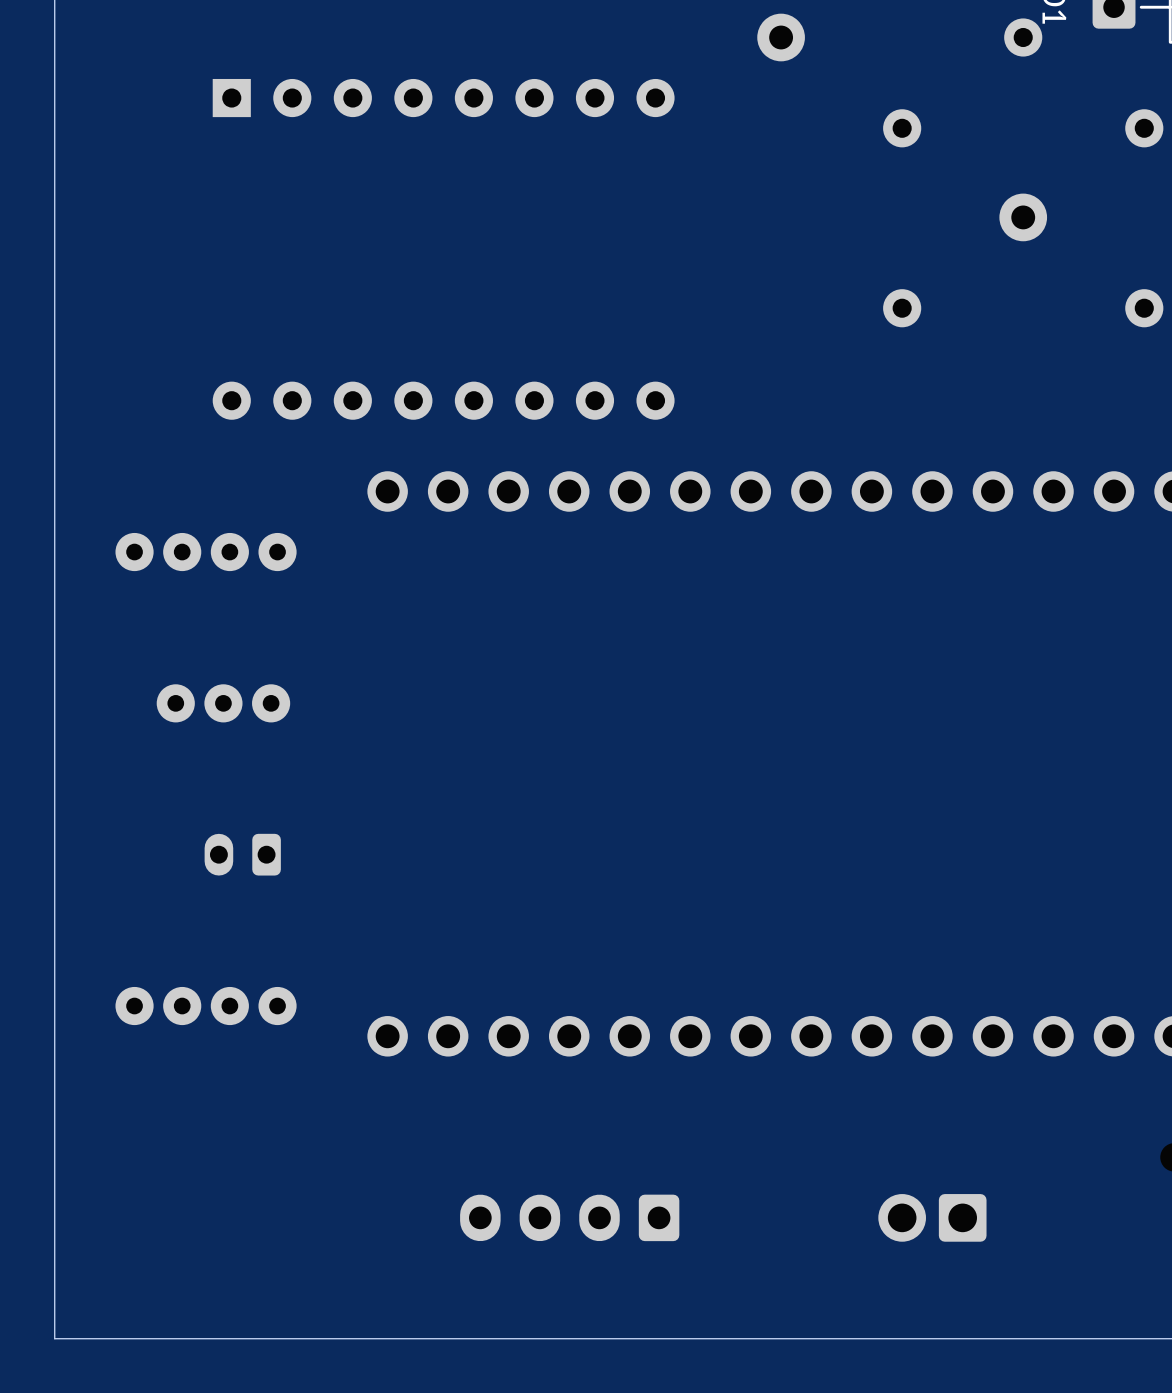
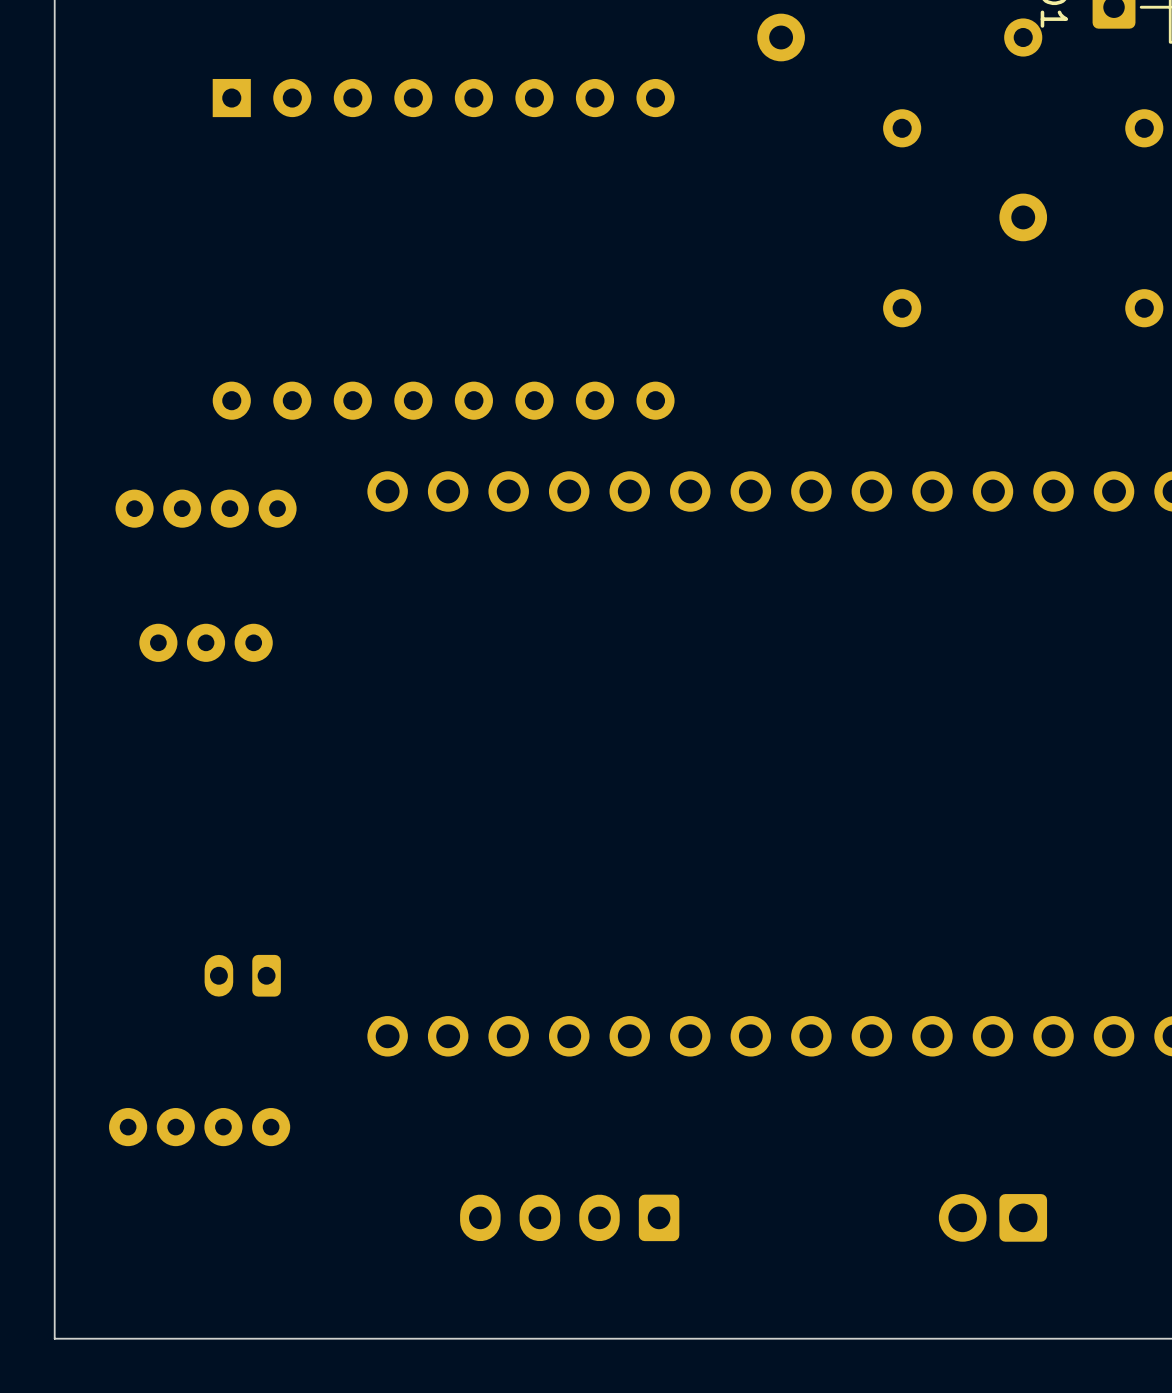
part position: (206, 552) -> (206, 508)
part position: (223, 703) -> (206, 642)
part position: (242, 854) -> (242, 975)
part position: (206, 1006) -> (199, 1127)
part position: (932, 1217) -> (992, 1217)

